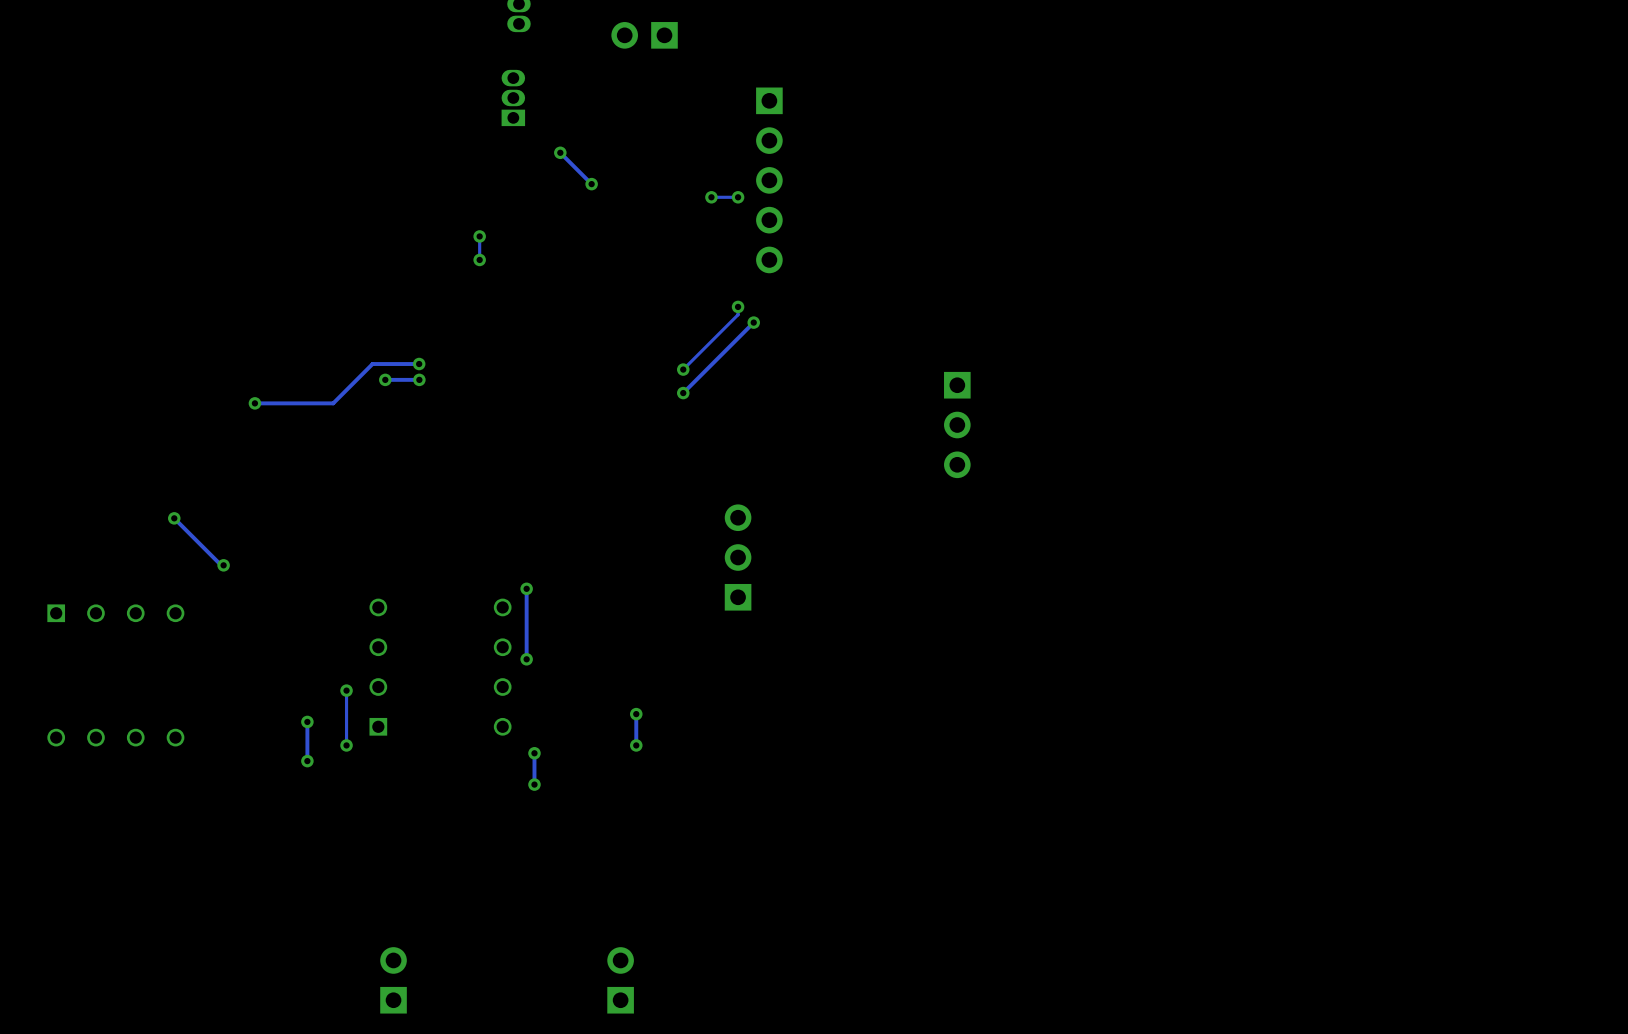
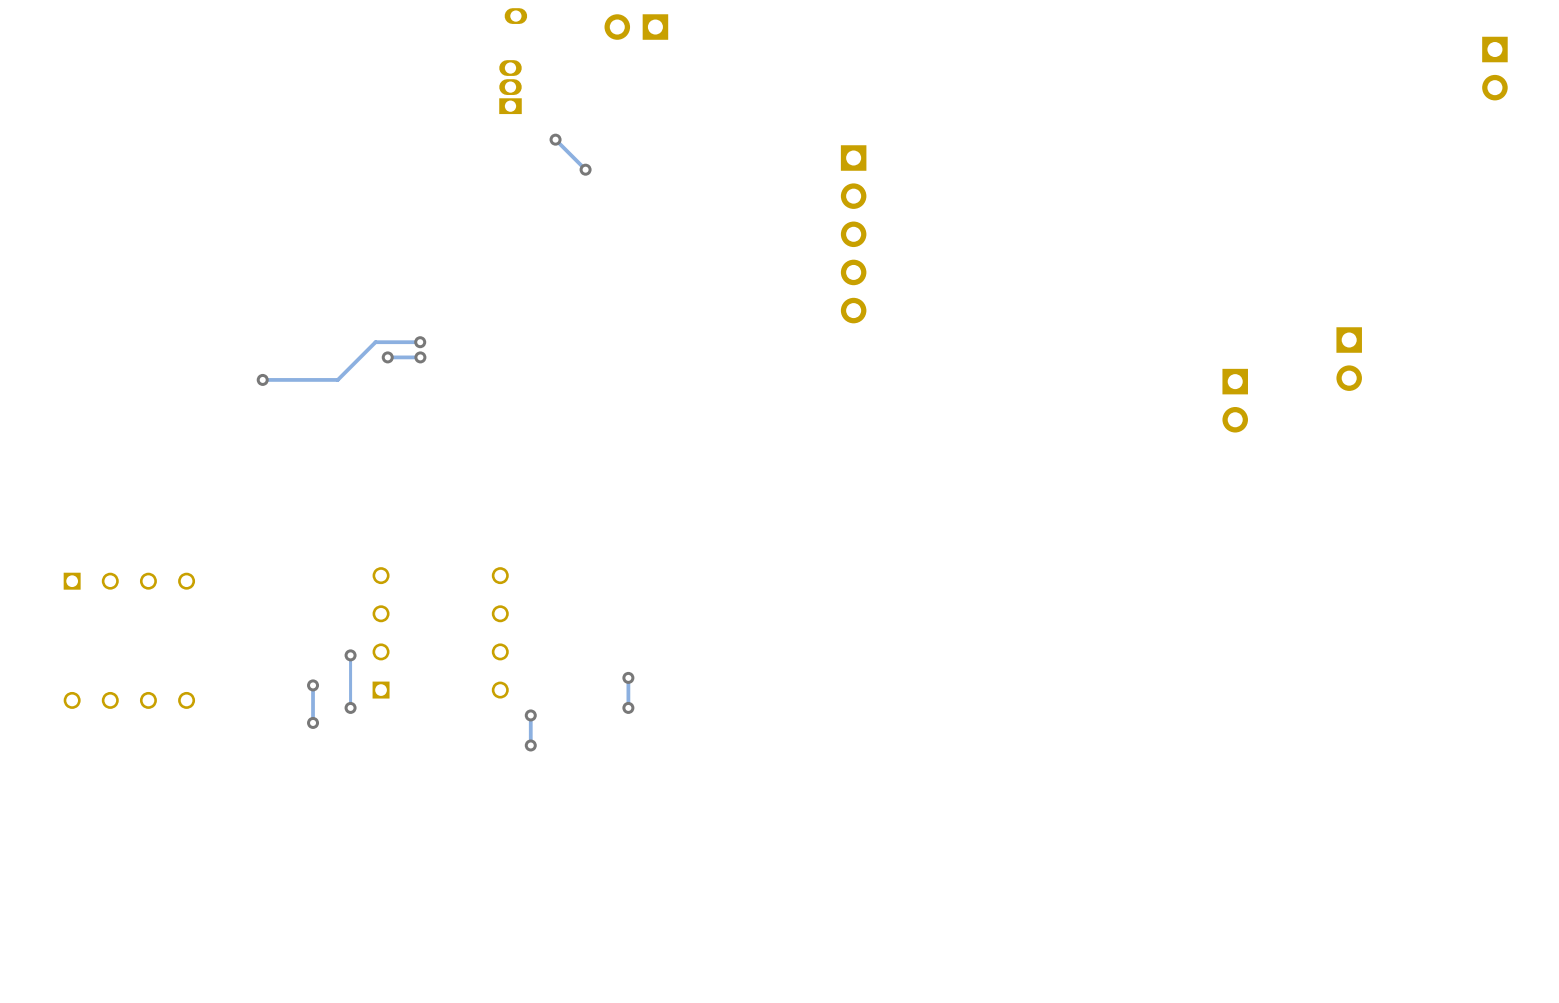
part: none -> (1494, 68)
part position: (769, 180) -> (853, 234)
via: (711, 197) -> none
track: (738, 197) (711, 197) -> none
via: (738, 197) -> none
track: (479, 236) (479, 259) -> none
via: (479, 236) -> none
via: (479, 259) -> none
track: (738, 306) (738, 314) (683, 369) -> none
via: (738, 306) -> none
track: (753, 322) (683, 393) -> none
via: (753, 322) -> none
via: (683, 369) -> none
part: none -> (1349, 359)
via: (683, 393) -> none
part: (957, 425) -> none
part: none -> (1235, 400)
track: (174, 518) (221, 565) (223, 565) -> none
via: (174, 518) -> none
part: (738, 557) -> none
via: (223, 565) -> none
track: (526, 588) (526, 659) -> none
via: (526, 588) -> none
via: (526, 659) -> none
part: (393, 980) -> none
part: (620, 980) -> none

